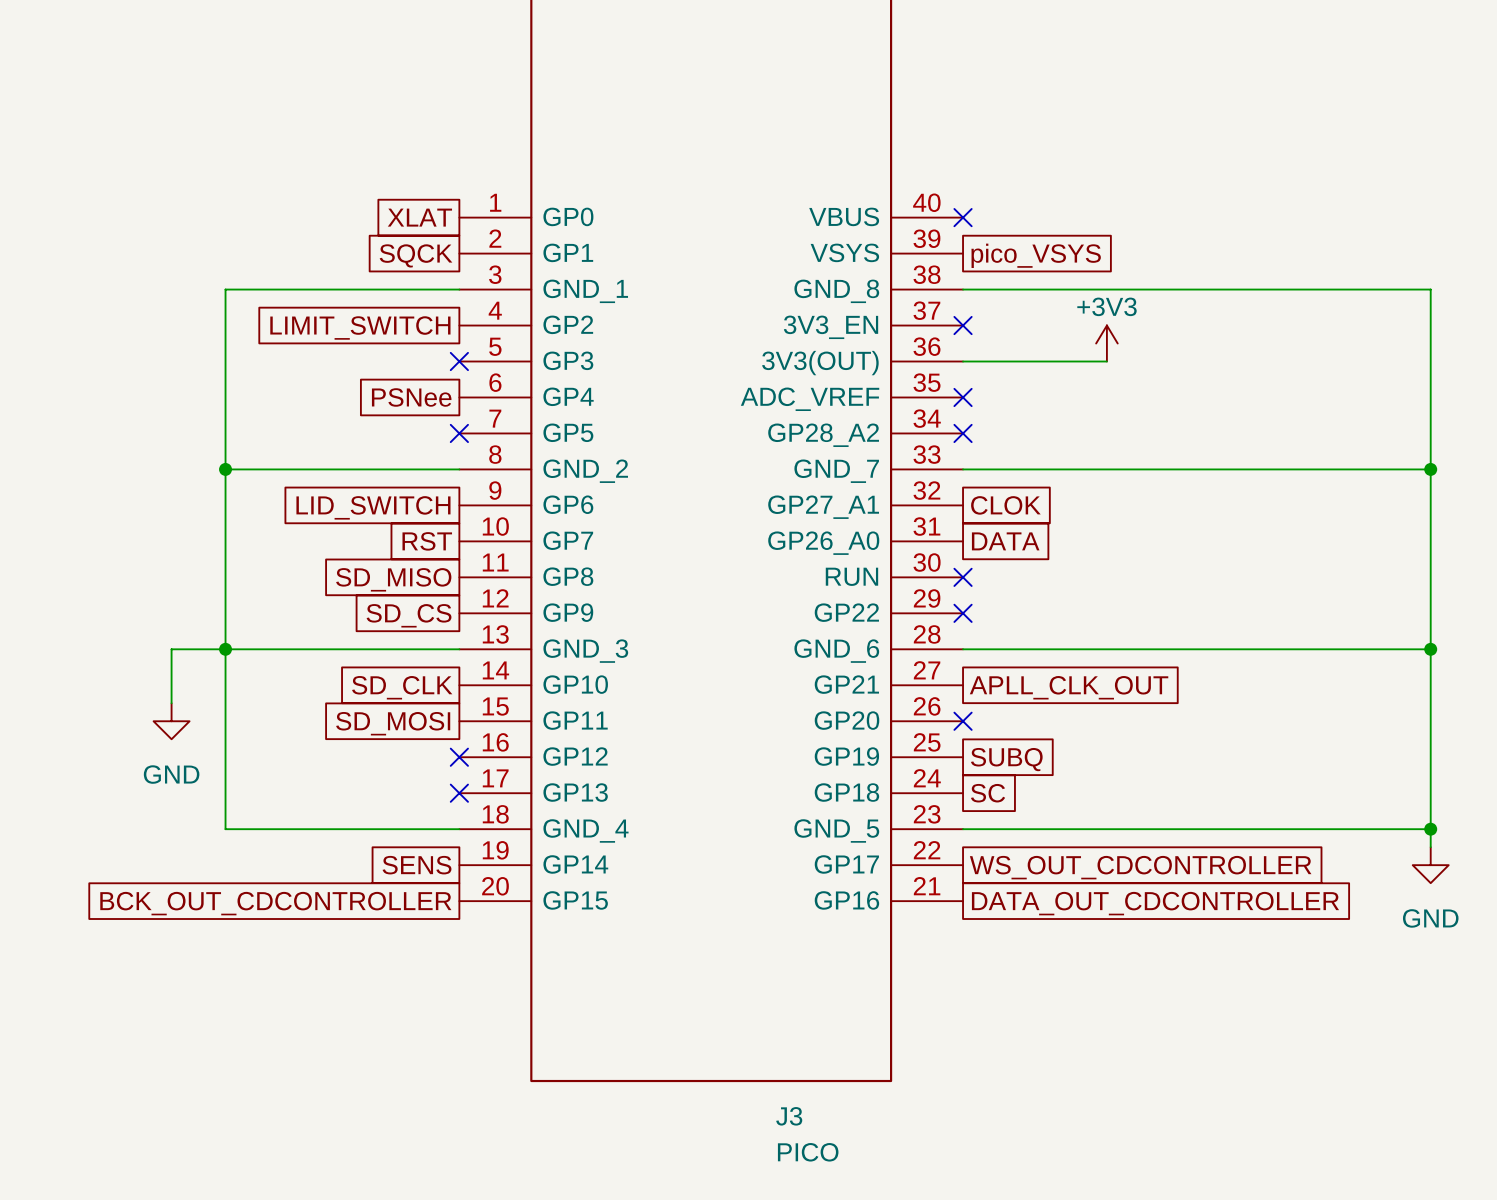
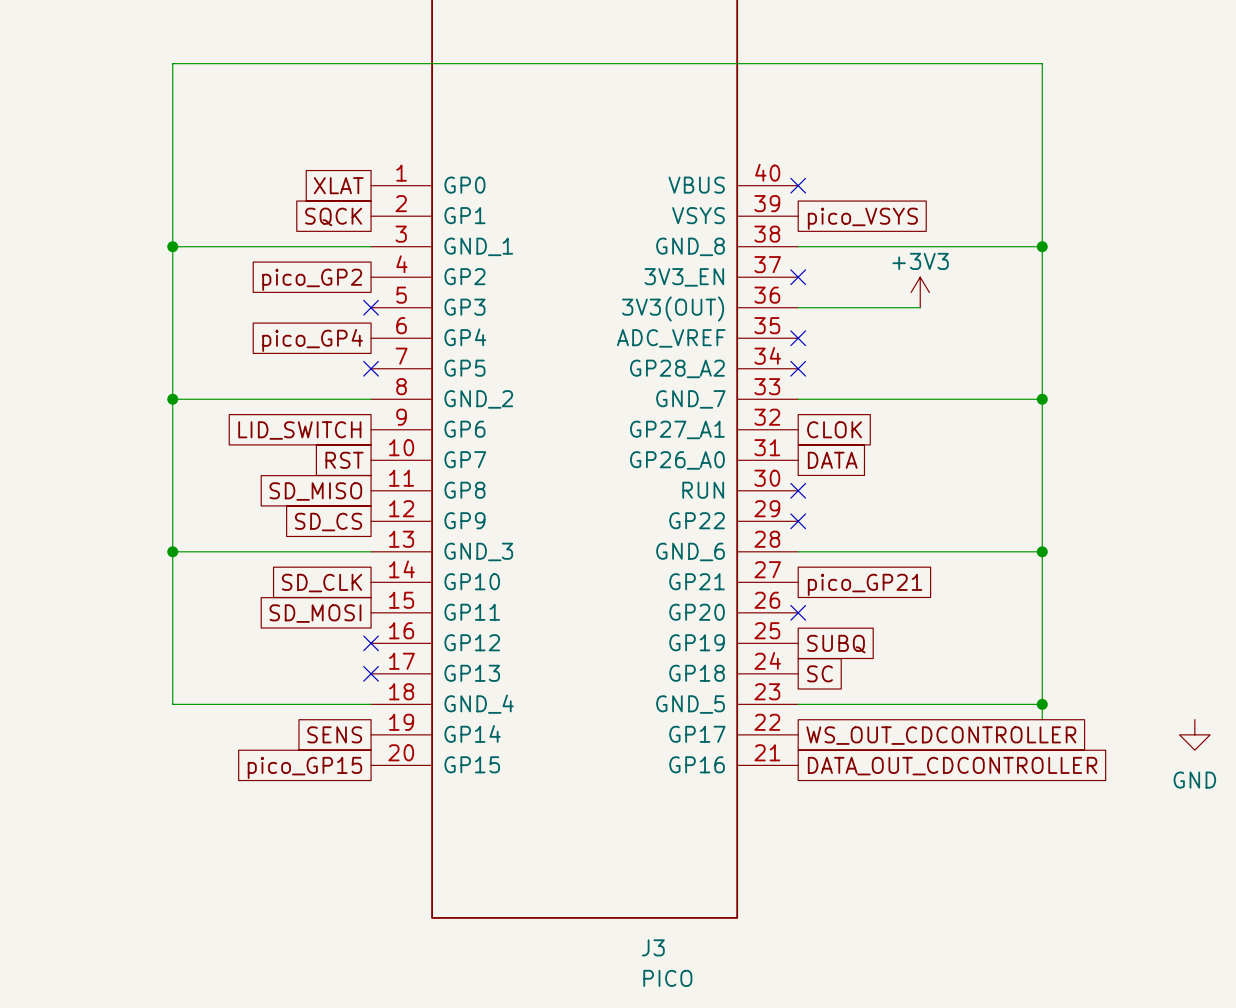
wire: none -> (172, 246) (172, 63) (1042, 63) (1042, 719)
junction: none -> (172, 246)
wire: (1250, 289) (1430, 289) (1430, 847) -> none
junction: none -> (1042, 246)
global label: LIMIT_SWITCH (360, 327) -> pico_GP2 (312, 279)
global label: PSNee (411, 397) -> pico_GP4 (312, 340)
wire: (1250, 469) (1430, 469) -> none
junction: none -> (1042, 399)
junction: (1430, 469) -> none
wire: (225, 649) (171, 649) (171, 703) -> none
wire: (1250, 649) (1430, 649) -> none
junction: none -> (1042, 551)
junction: (1430, 649) -> none
global label: APLL_CLK_OUT (1069, 687) -> pico_GP21 (865, 584)
power symbol: GND (171, 721) -> none
wire: (1250, 829) (1430, 829) -> none
junction: none -> (1042, 704)
junction: (1430, 829) -> none
global label: BCK_OUT_CDCONTROLLER (275, 903) -> pico_GP15 (304, 767)

